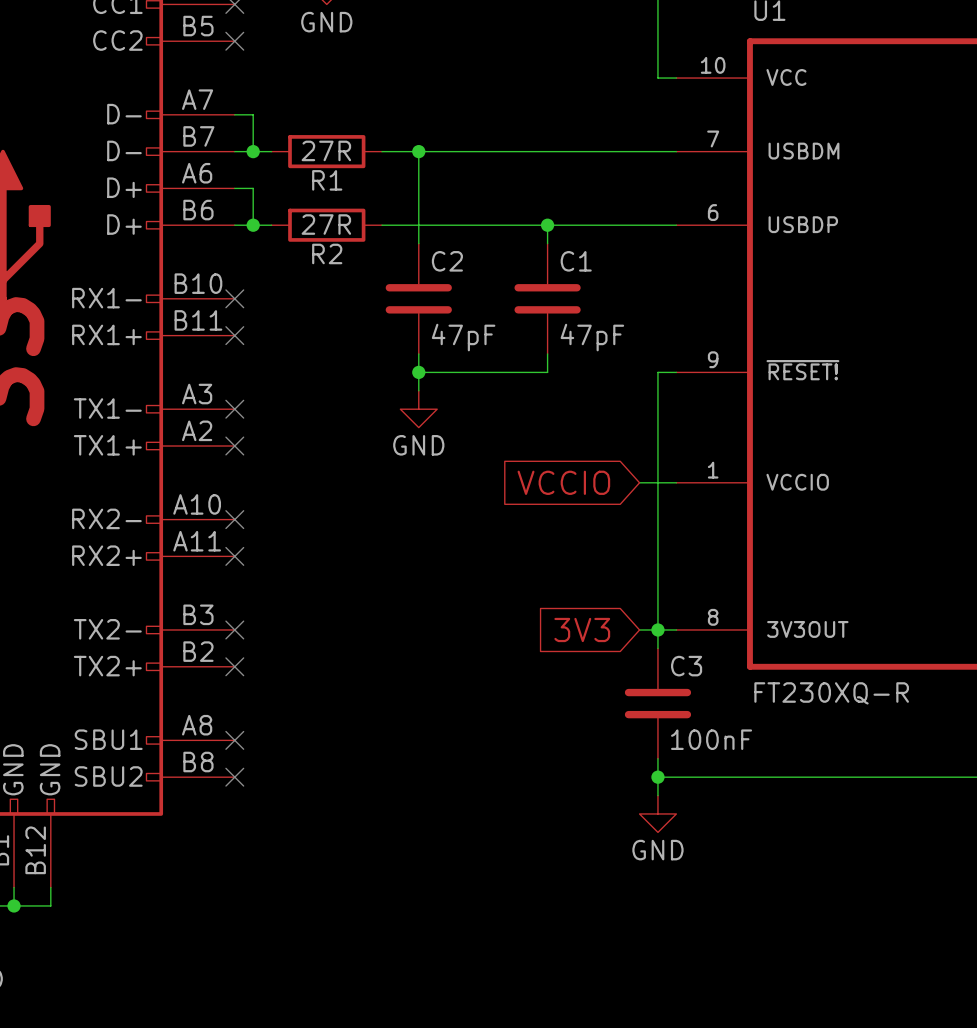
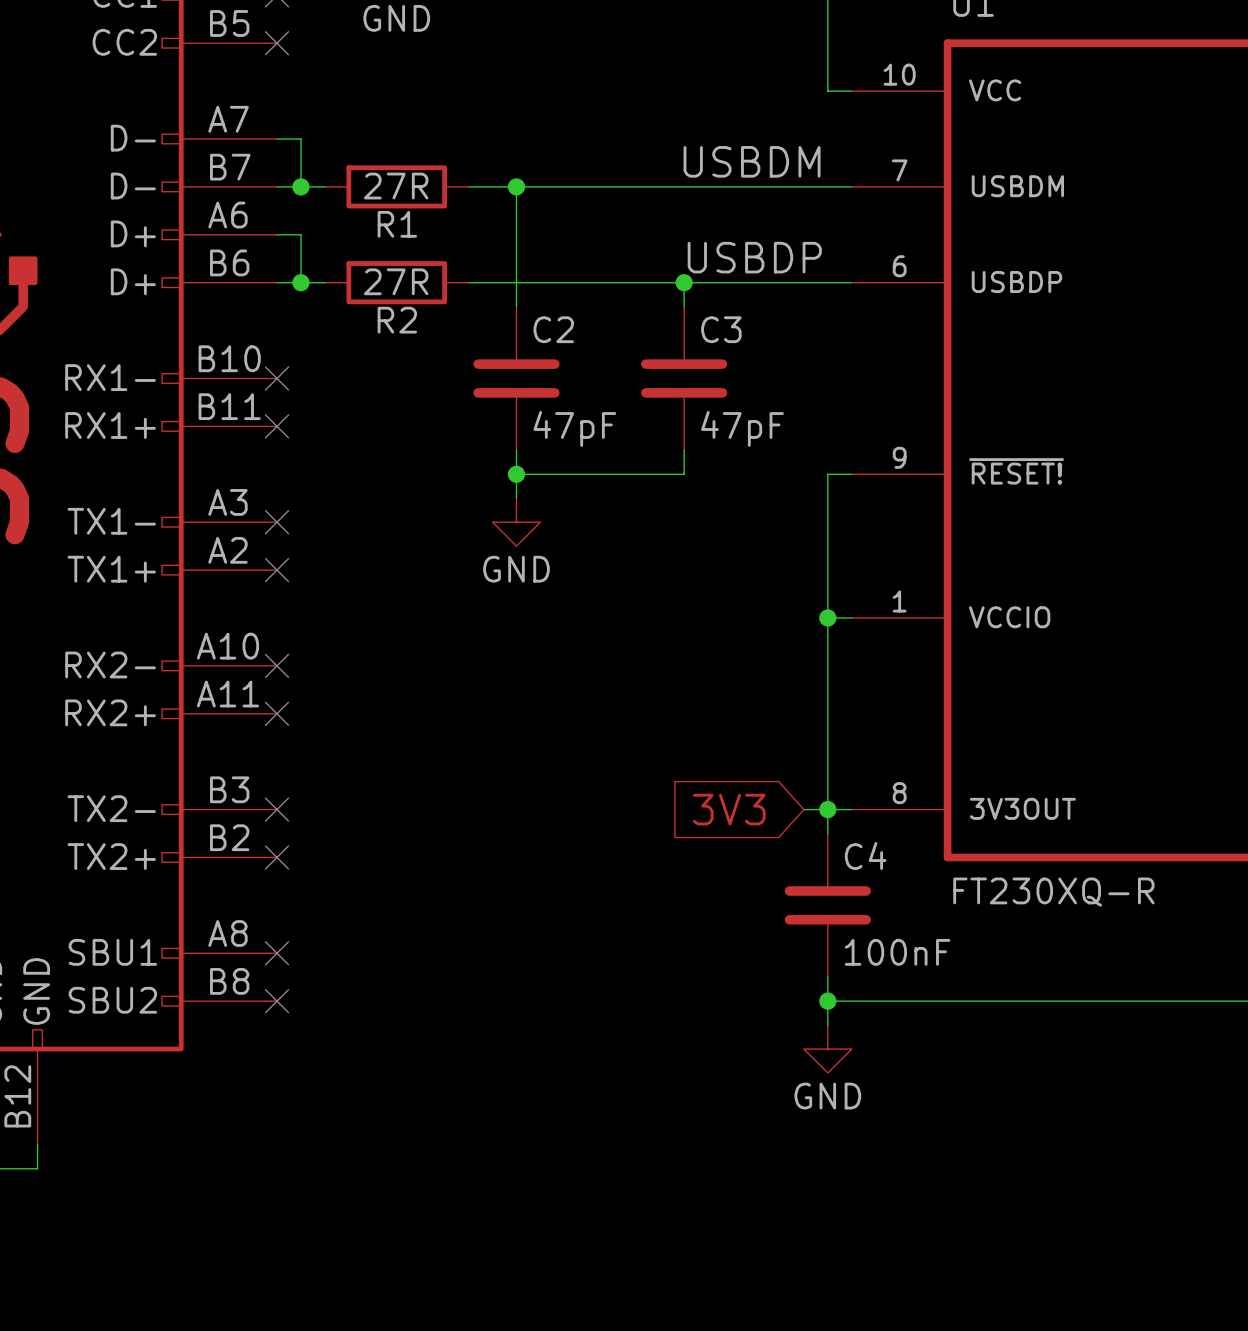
label: none -> USBDM (752, 161)
label: none -> USBDP (754, 257)
C1 name: C1 (576, 261) -> C3 (721, 329)
global label: VCCIO (563, 482) -> none
wire: (639, 482) (657, 482) -> none
junction: none -> (827, 617)
C3 name: C3 (686, 666) -> C4 (865, 856)

